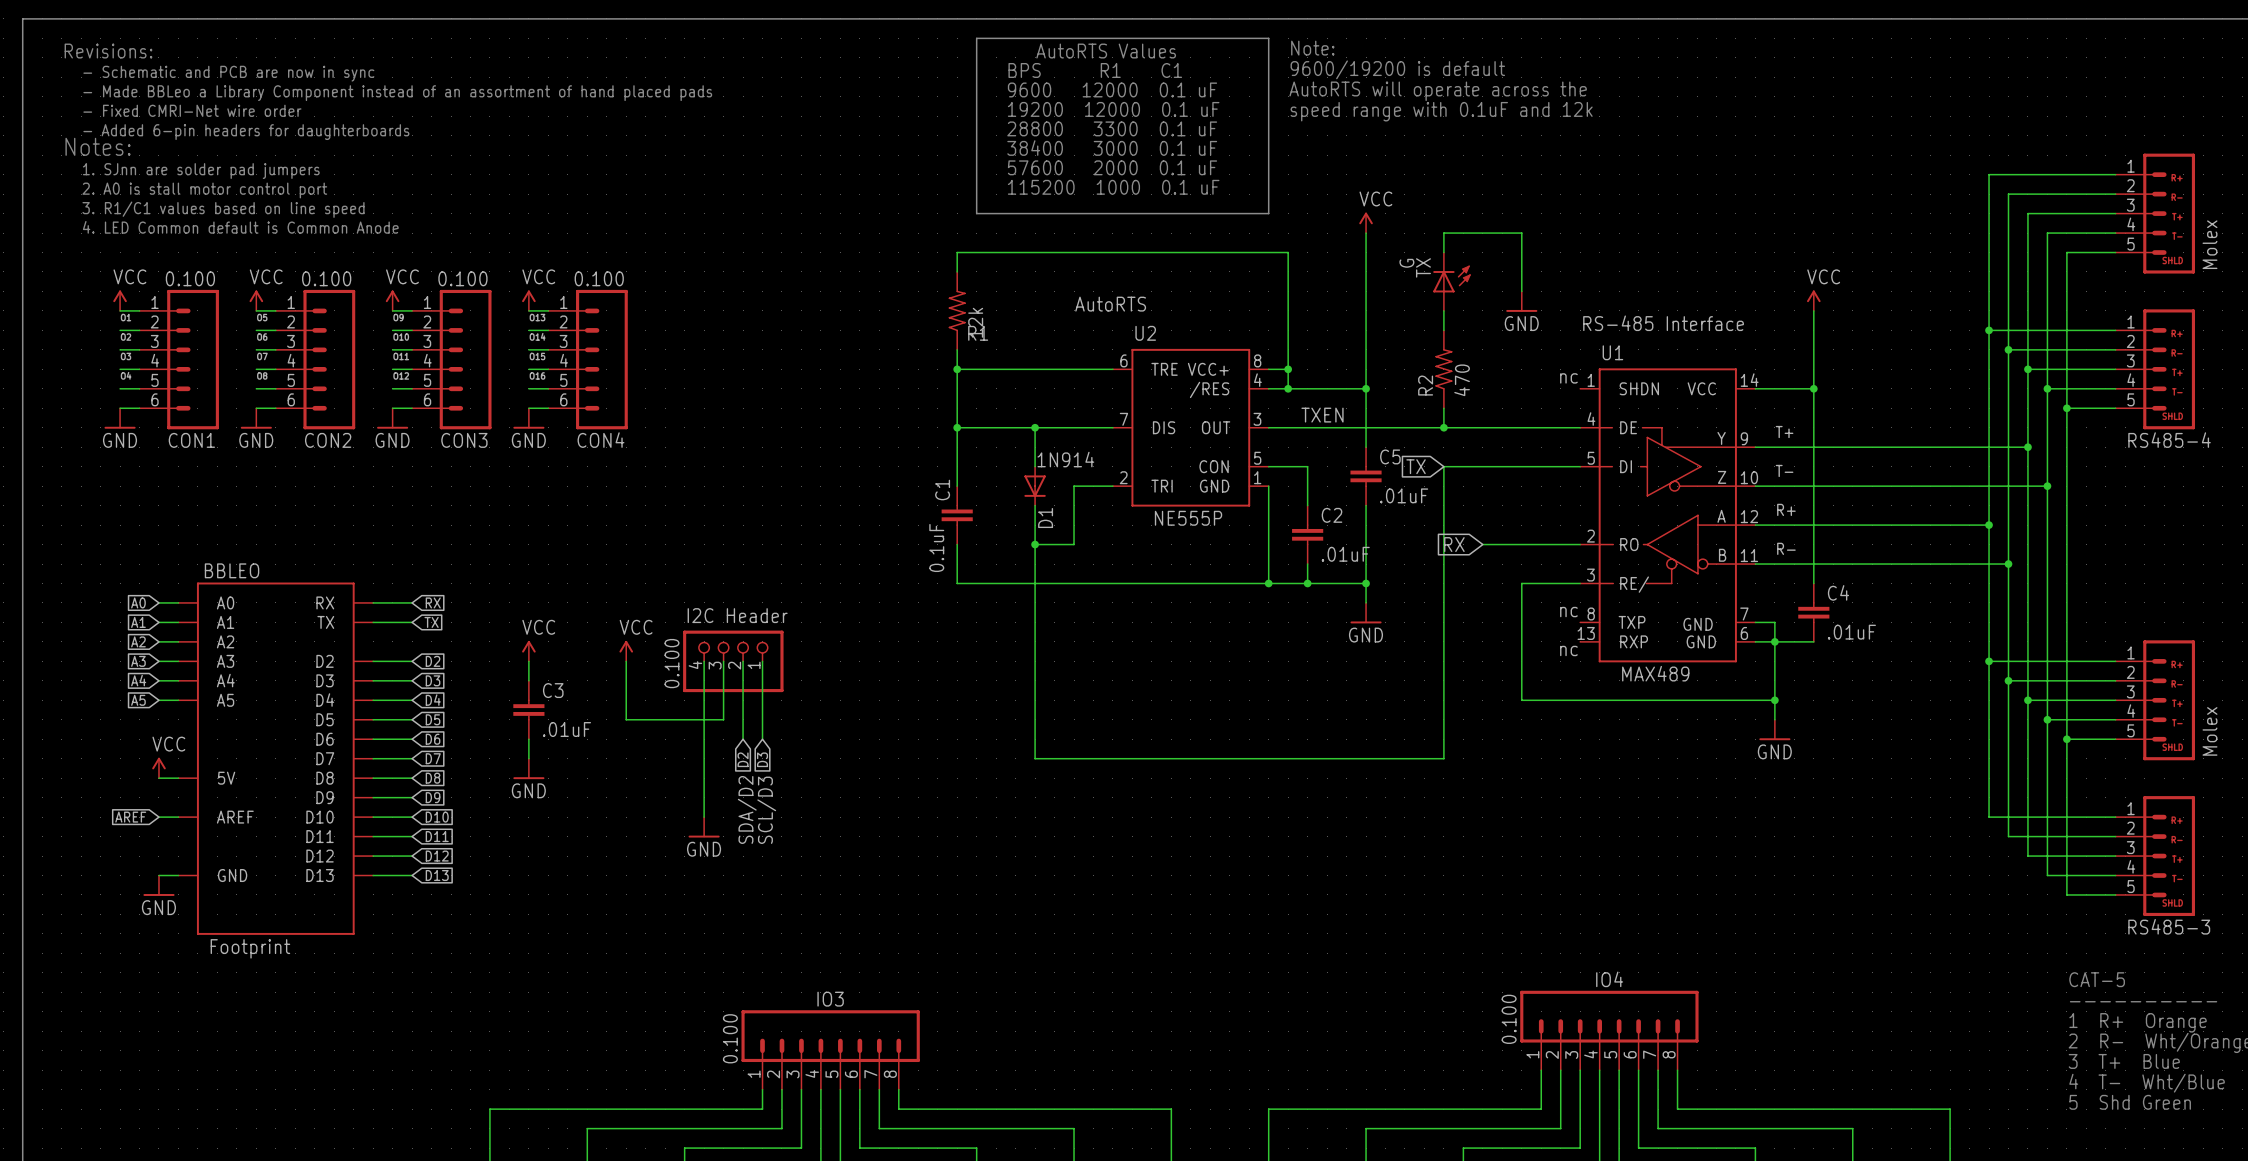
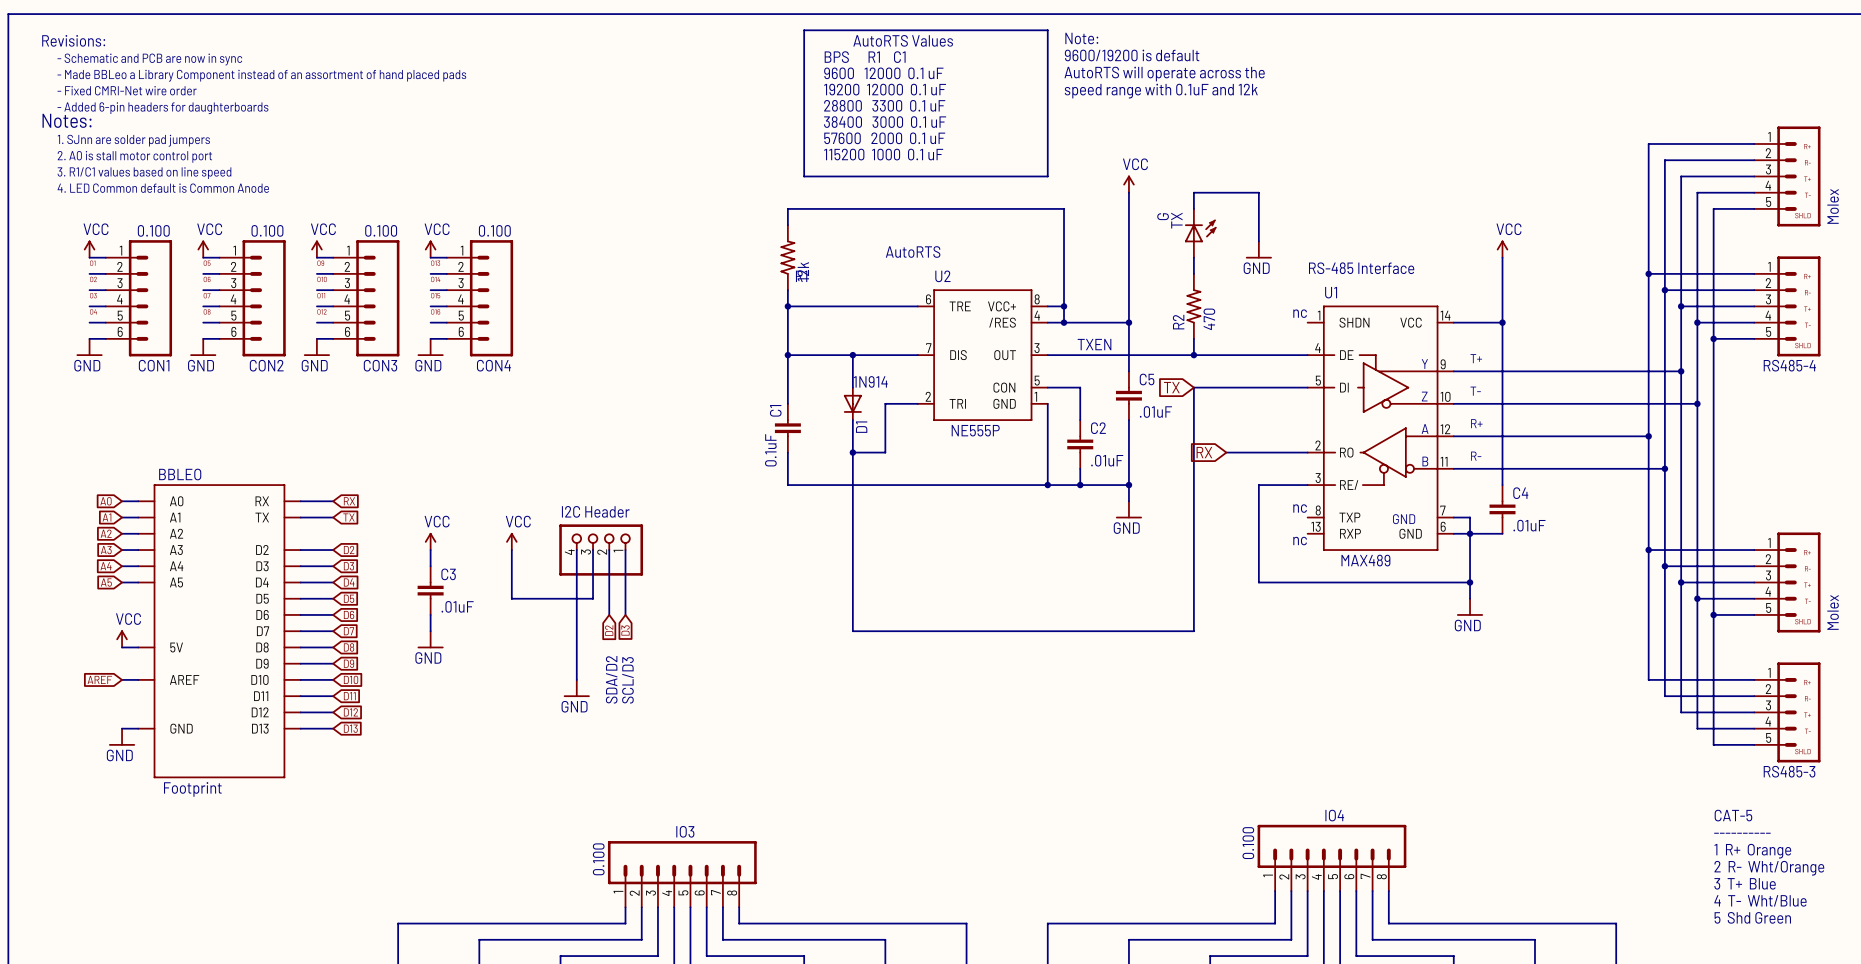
part value: 0.100 (671, 663) -> none

